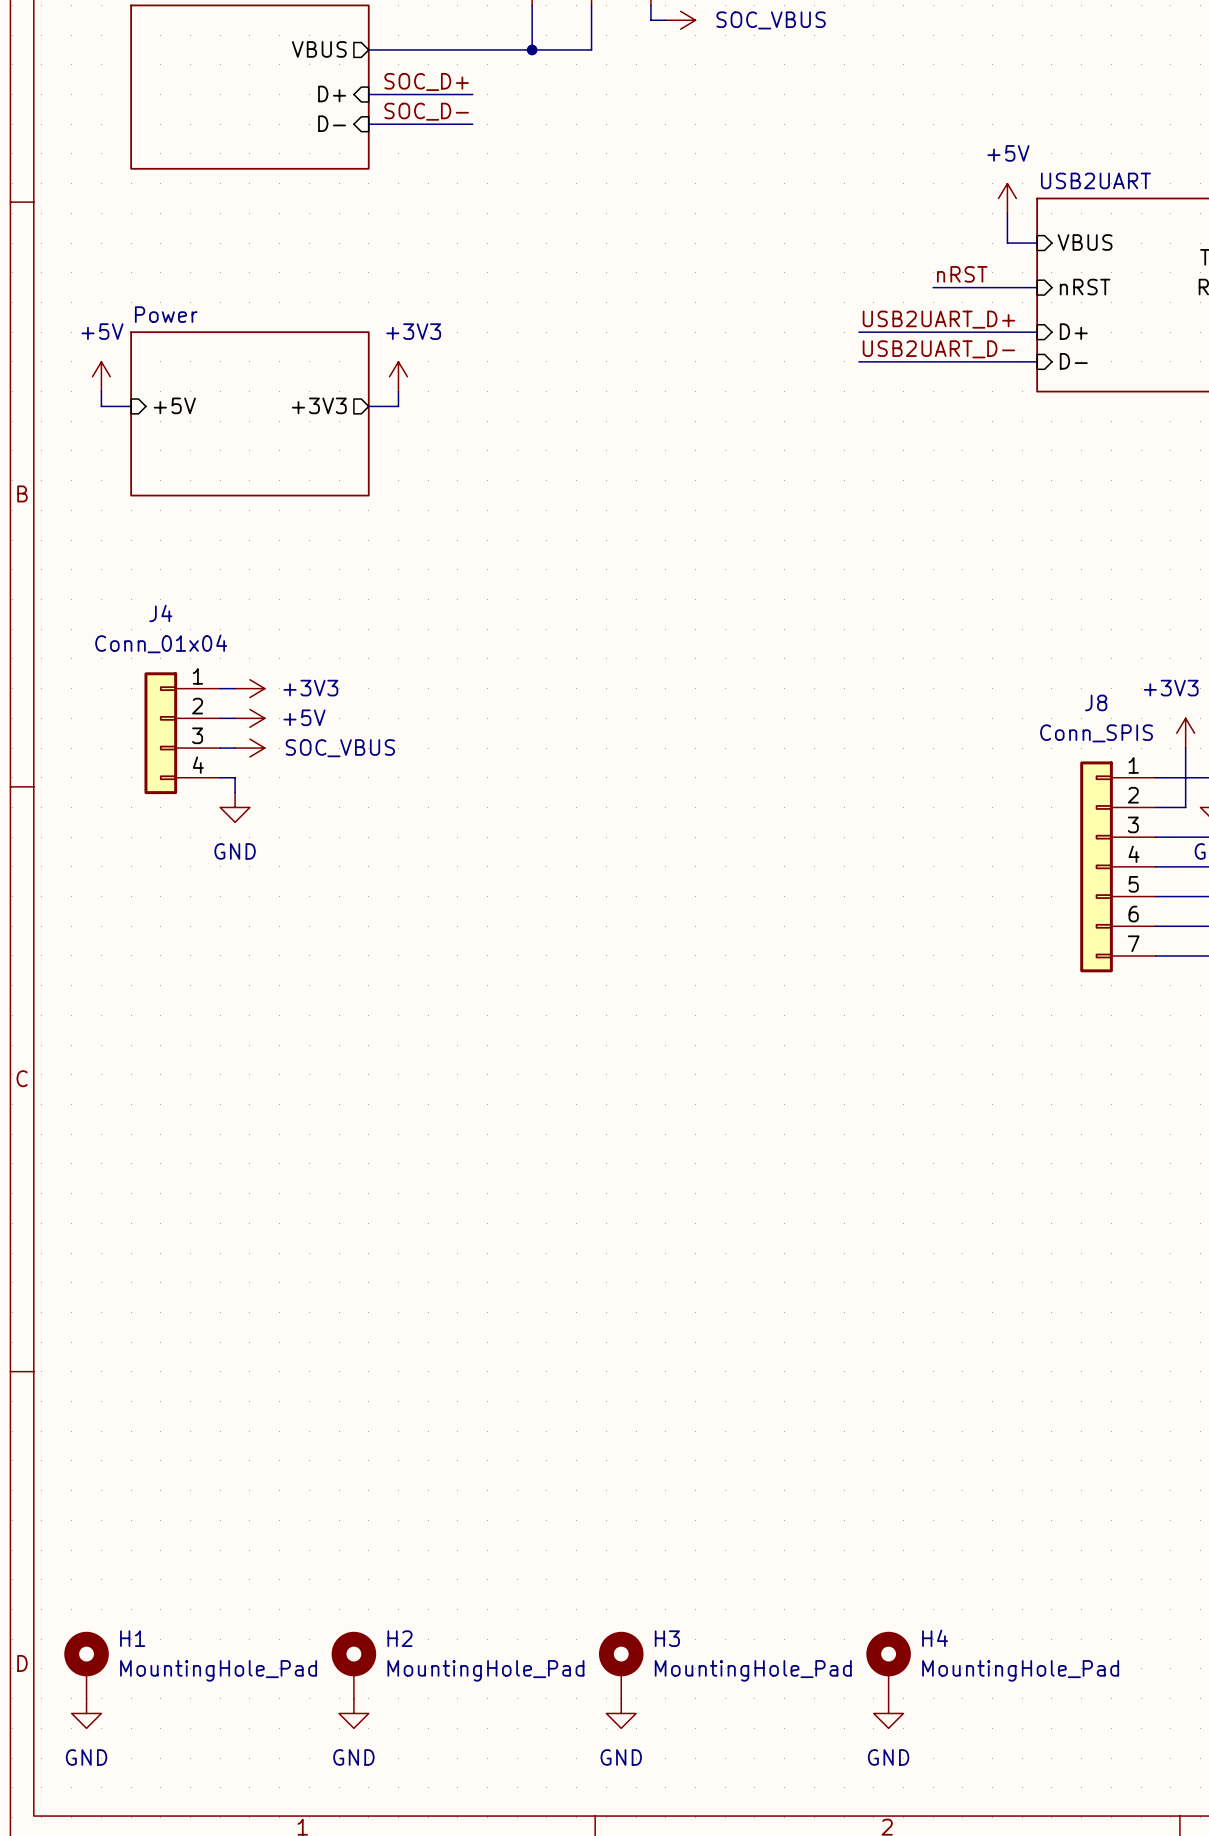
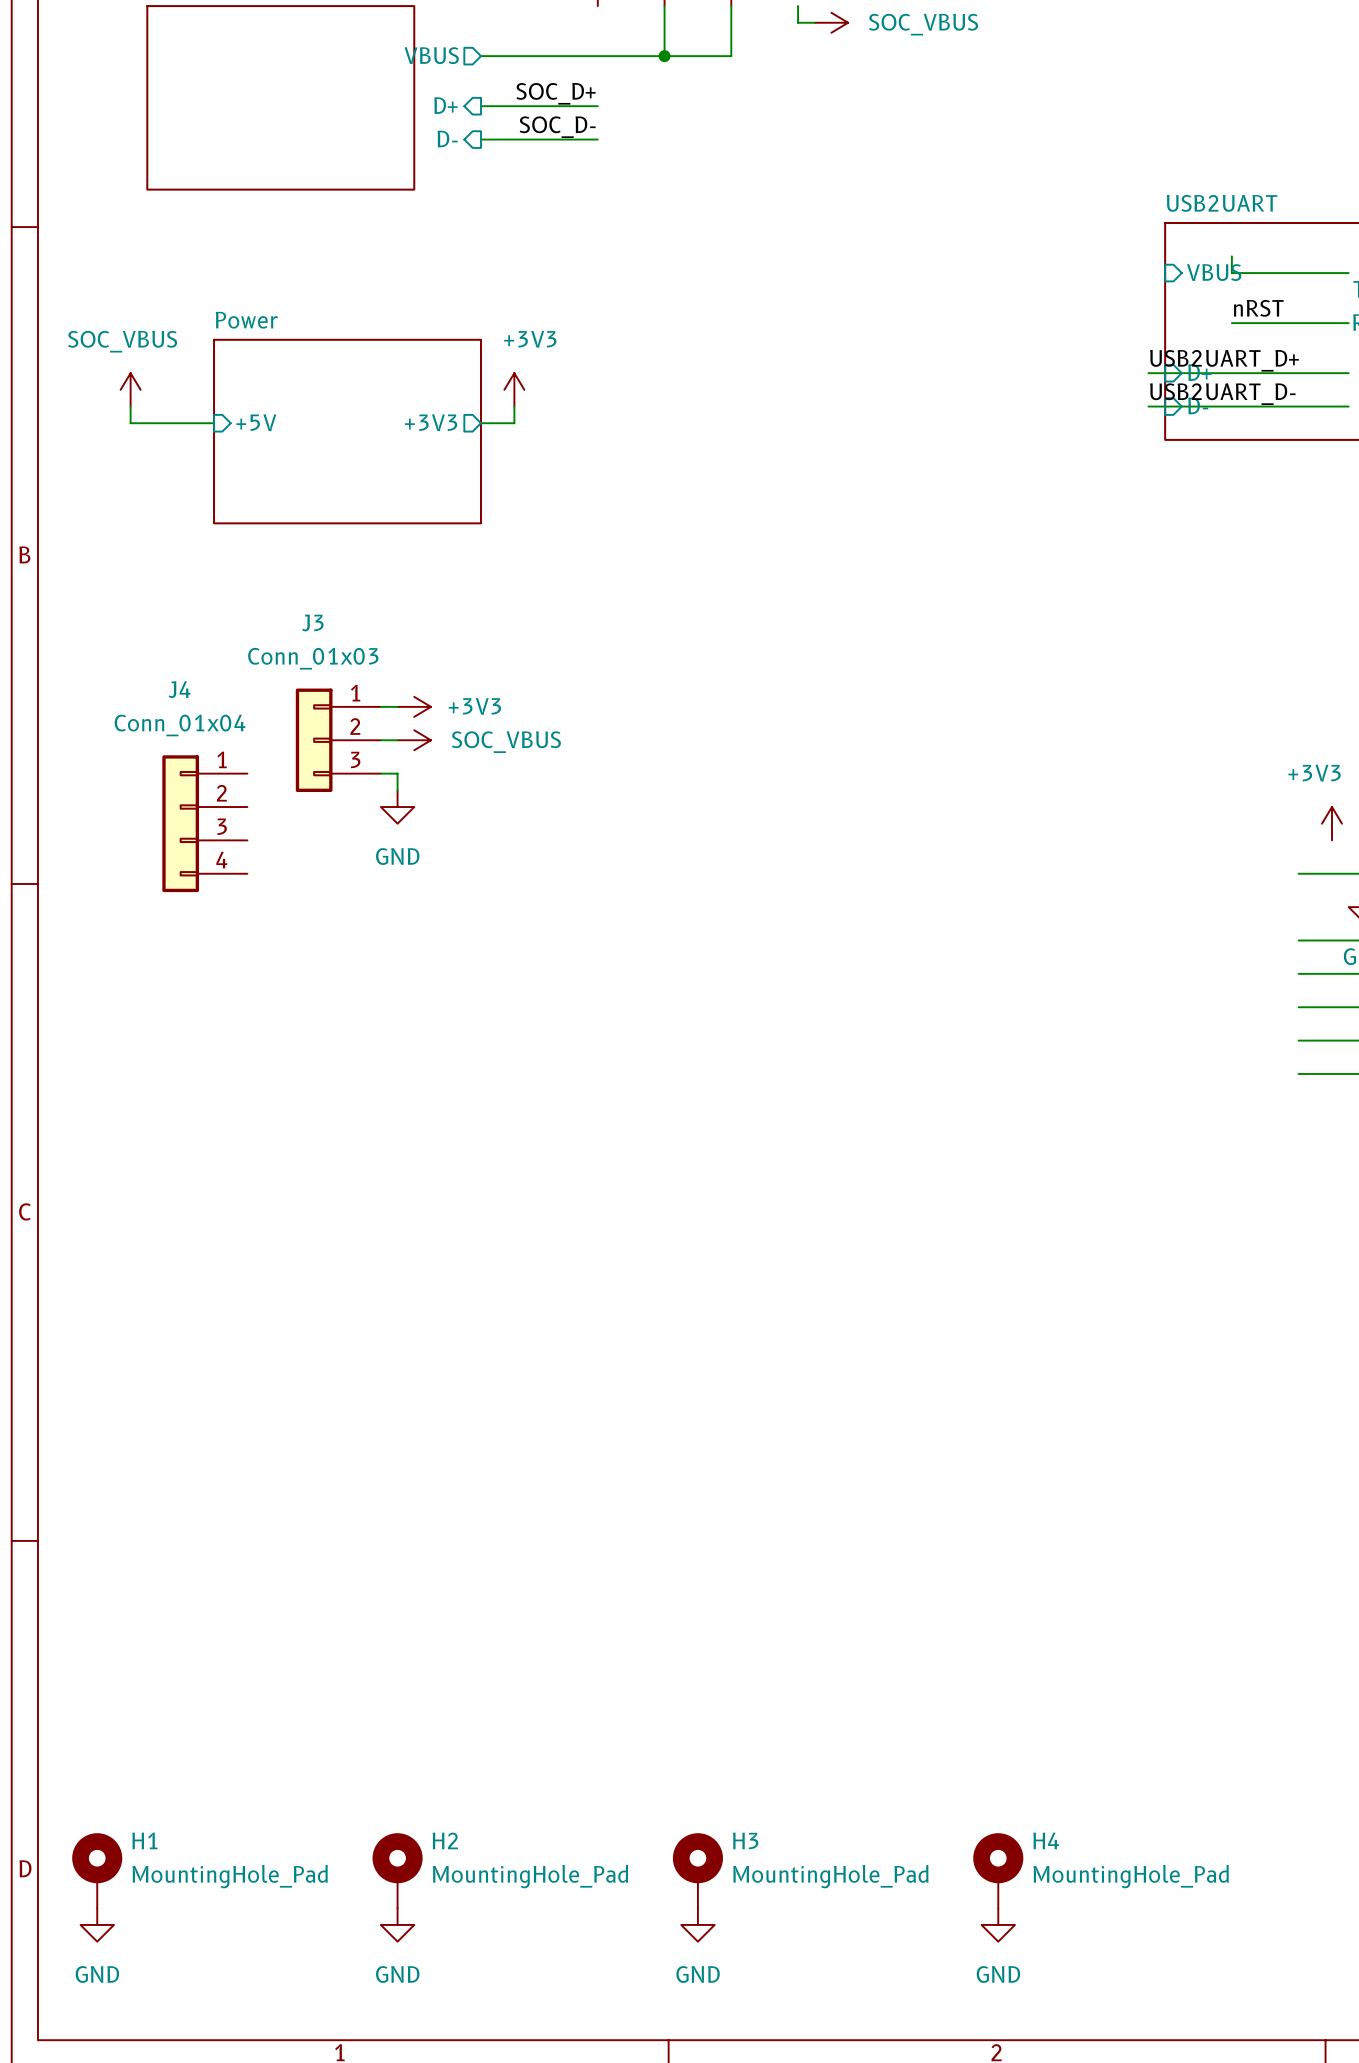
wire: (532, 5) (532, 49) -> none
wire: none -> (798, 6) (798, 22) (814, 22)
wire: (650, 20) (665, 20) -> (731, 22) (731, 56) (664, 56)
power symbol position: SOC_VBUS (680, 20) -> SOC_VBUS (831, 22)
sheet pin position: VBUS (319, 49) -> VBUS (431, 55)
wire: (368, 49) (428, 49) -> none
junction position: (532, 49) -> (664, 56)
label position: SOC_D+ (426, 81) -> SOC_D+ (556, 93)
sheet pin position: D+ (332, 93) -> D+ (445, 105)
wire: (368, 94) (428, 94) -> (531, 106) (597, 106)
label position: SOC_D- (426, 111) -> SOC_D- (557, 127)
sheet pin position: D- (332, 123) -> D- (447, 138)
wire: (368, 124) (428, 124) -> (531, 139) (597, 139)
power symbol: +5V (1007, 198) -> none
wire: (1007, 213) (1007, 243) (1037, 243) -> none
wire: none -> (1231, 256) (1231, 273) (1348, 273)
label: nRST (962, 274) -> none
label: none -> nRST (1258, 308)
wire: (933, 287) (1037, 287) -> (1231, 323) (1348, 323)
sheet pin: nRST (1085, 287) -> none
label position: USB2UART_D+ (938, 319) -> USB2UART_D+ (1224, 360)
wire: (858, 332) (1022, 332) -> (1165, 373) (1348, 373)
power symbol: none -> SOC_VBUS (130, 389)
label position: USB2UART_D- (938, 349) -> USB2UART_D- (1222, 394)
wire: none -> (130, 406) (130, 423) (214, 423)
wire: (858, 361) (1022, 361) -> (1165, 406) (1348, 406)
power symbol: +5V (101, 376) -> none
power symbol position: +3V3 (398, 376) -> +3V3 (514, 389)
wire: (101, 391) (101, 406) (131, 406) -> none
wire: (398, 391) (398, 406) (368, 406) -> (514, 406) (514, 423) (481, 423)
sheet pin position: +5V (174, 405) -> +5V (256, 422)
sheet pin position: +3V3 (319, 405) -> +3V3 (431, 422)
sheet Power position: (249, 413) -> (347, 431)
power symbol: none -> +3V3 (414, 706)
J3: none -> Conn_01x03 (338, 740)
wire: (220, 688) (235, 688) -> none
power symbol: +3V3 (249, 688) -> none
wire: (220, 718) (235, 718) -> (380, 706) (397, 706)
power symbol: +5V (249, 718) -> none
wire: (220, 748) (235, 748) -> (380, 740) (397, 740)
power symbol position: SOC_VBUS (249, 748) -> SOC_VBUS (414, 740)
wire: (1185, 748) (1185, 807) (1155, 807) -> none
wire: (220, 777) (235, 777) (235, 792) -> (380, 773) (397, 773) (397, 790)
power symbol position: GND (235, 807) -> GND (397, 807)
J8: Conn_SPIS (1118, 866) -> none

